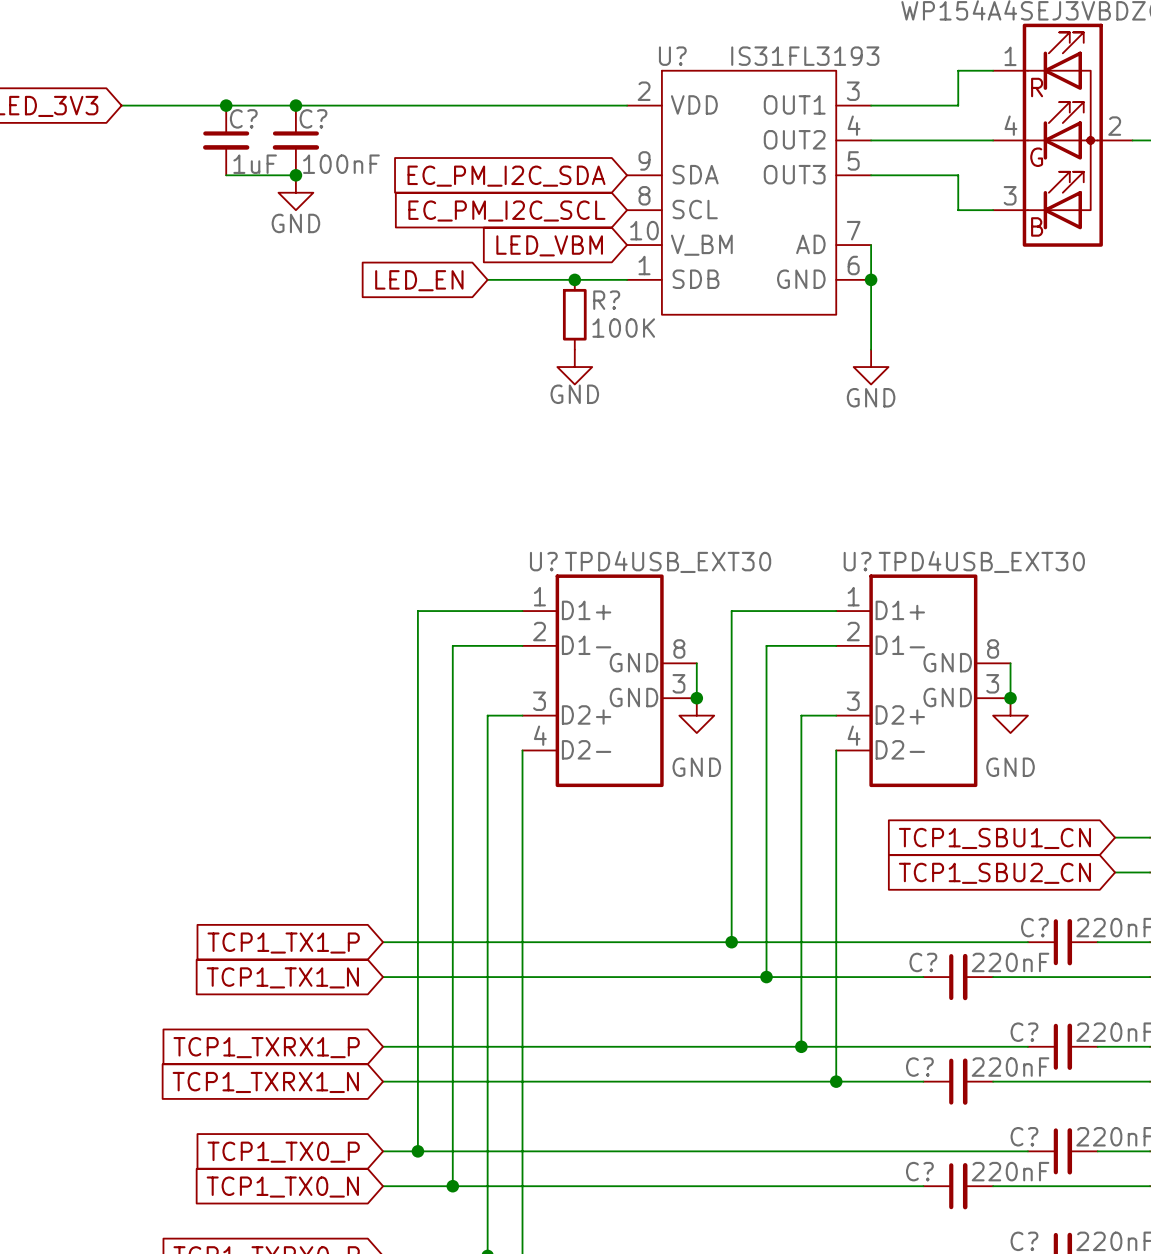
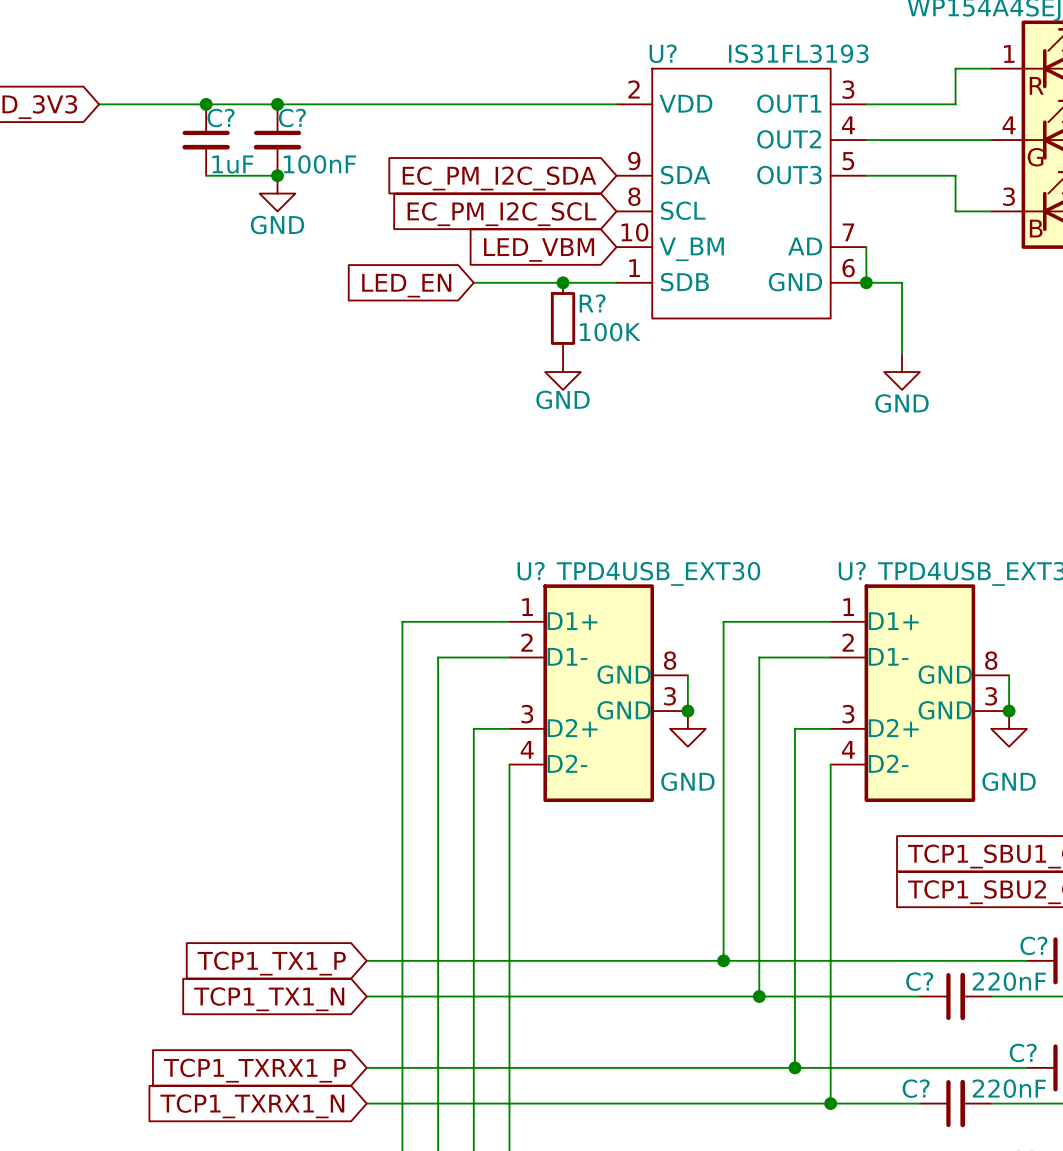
wire: (871, 279) (871, 349) -> (866, 282) (902, 282) (902, 354)
power symbol position: GND (871, 367) -> GND (902, 372)

